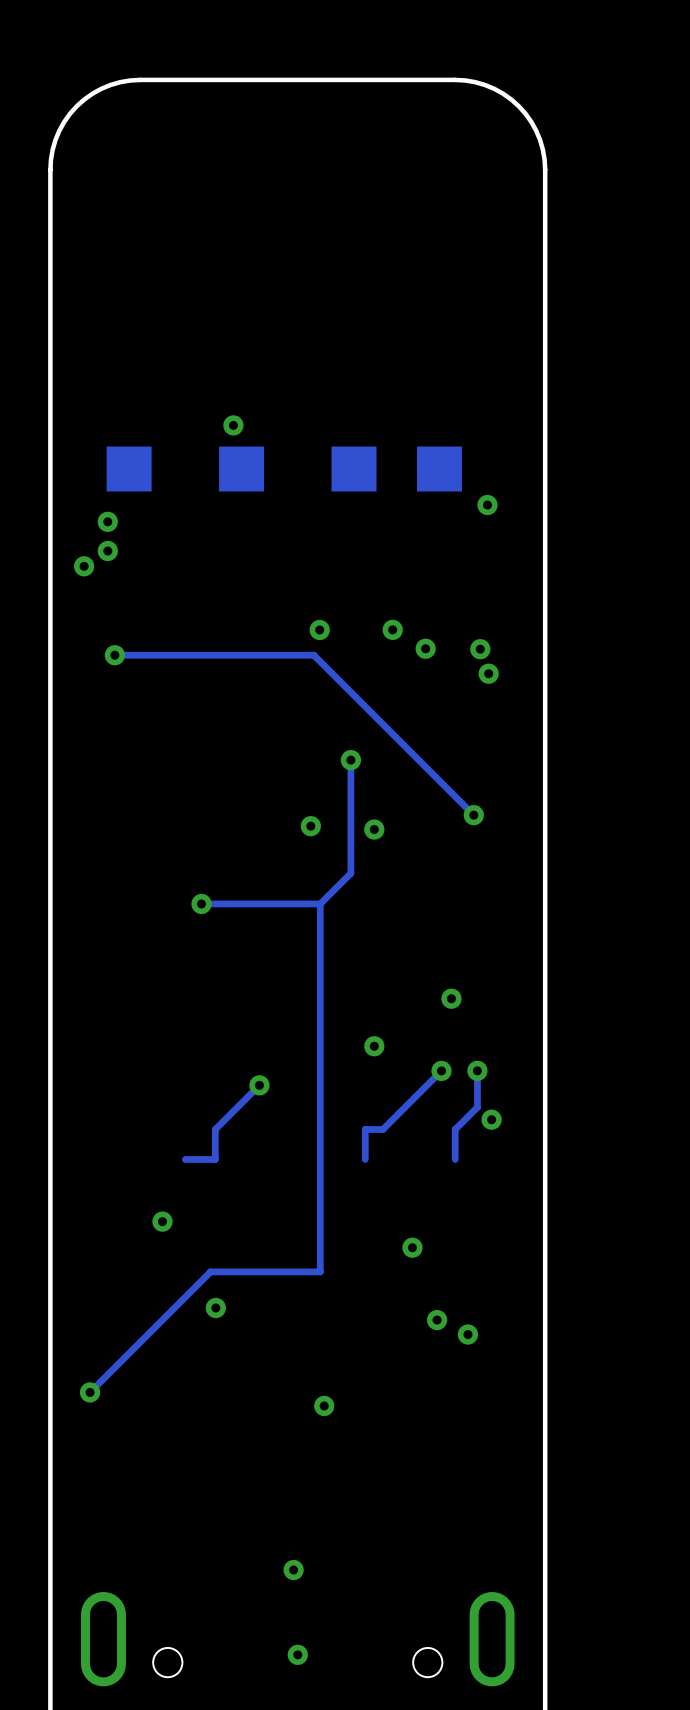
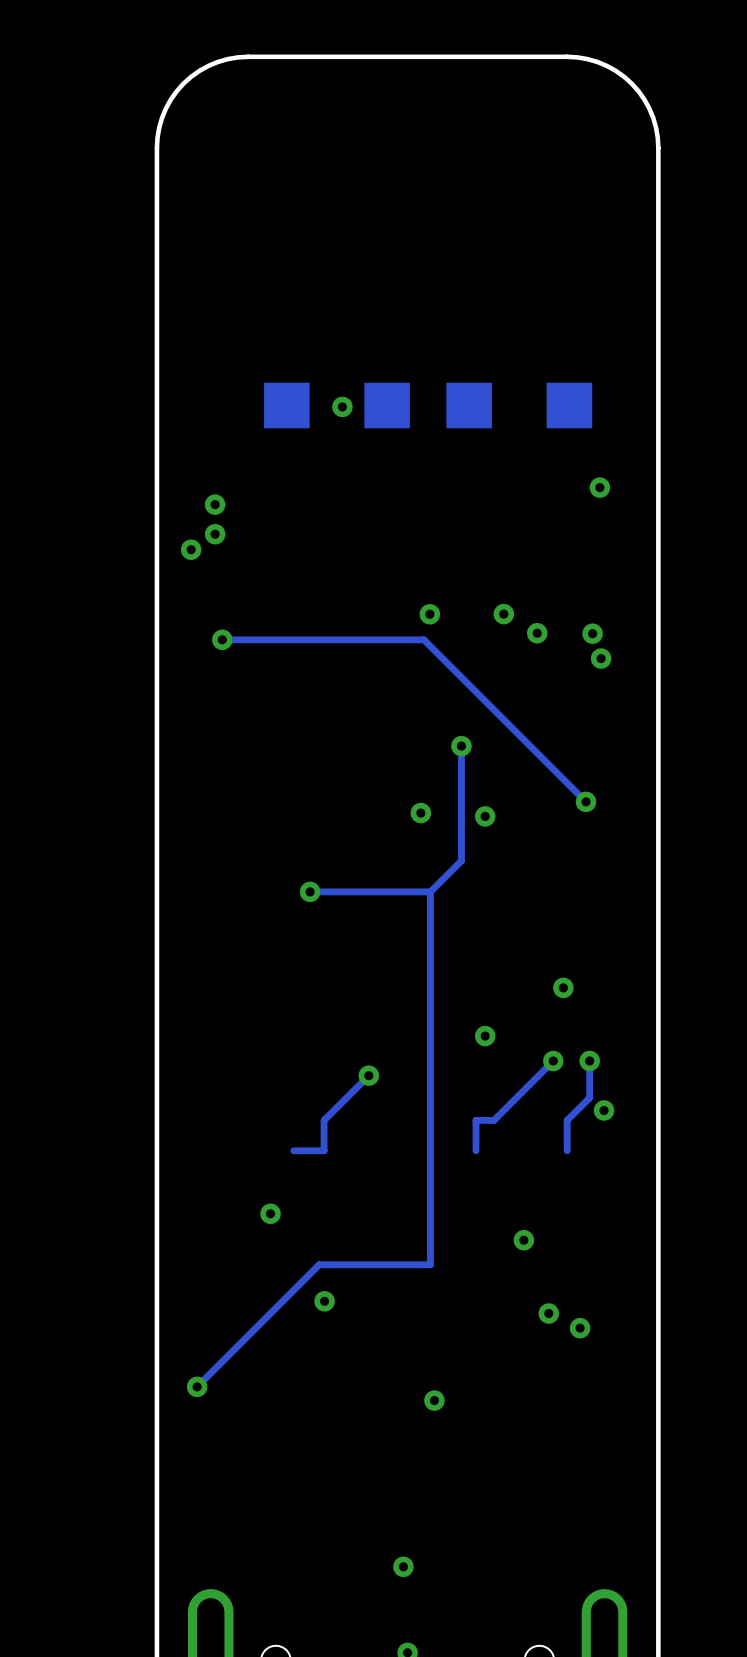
part: none -> (286, 405)
part: none -> (387, 405)
part: none -> (469, 405)
part: none -> (569, 405)
part: (129, 469) -> none
part: (241, 469) -> none
part: (354, 469) -> none
part: (439, 469) -> none

